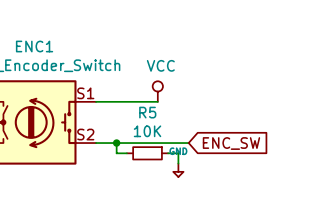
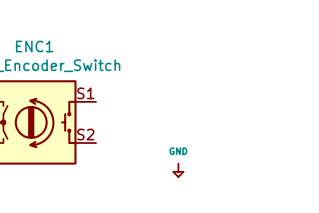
power symbol: VCC (157, 91) -> none
wire: (96, 101) (157, 101) -> none
wire: (96, 143) (188, 143) -> none
wire: (116, 143) (116, 153) (126, 153) -> none
junction: (116, 143) -> none
global label: ENC_SW (231, 143) -> none
R5: 10K (147, 153) -> none
wire: (168, 153) (178, 153) (178, 163) -> none

